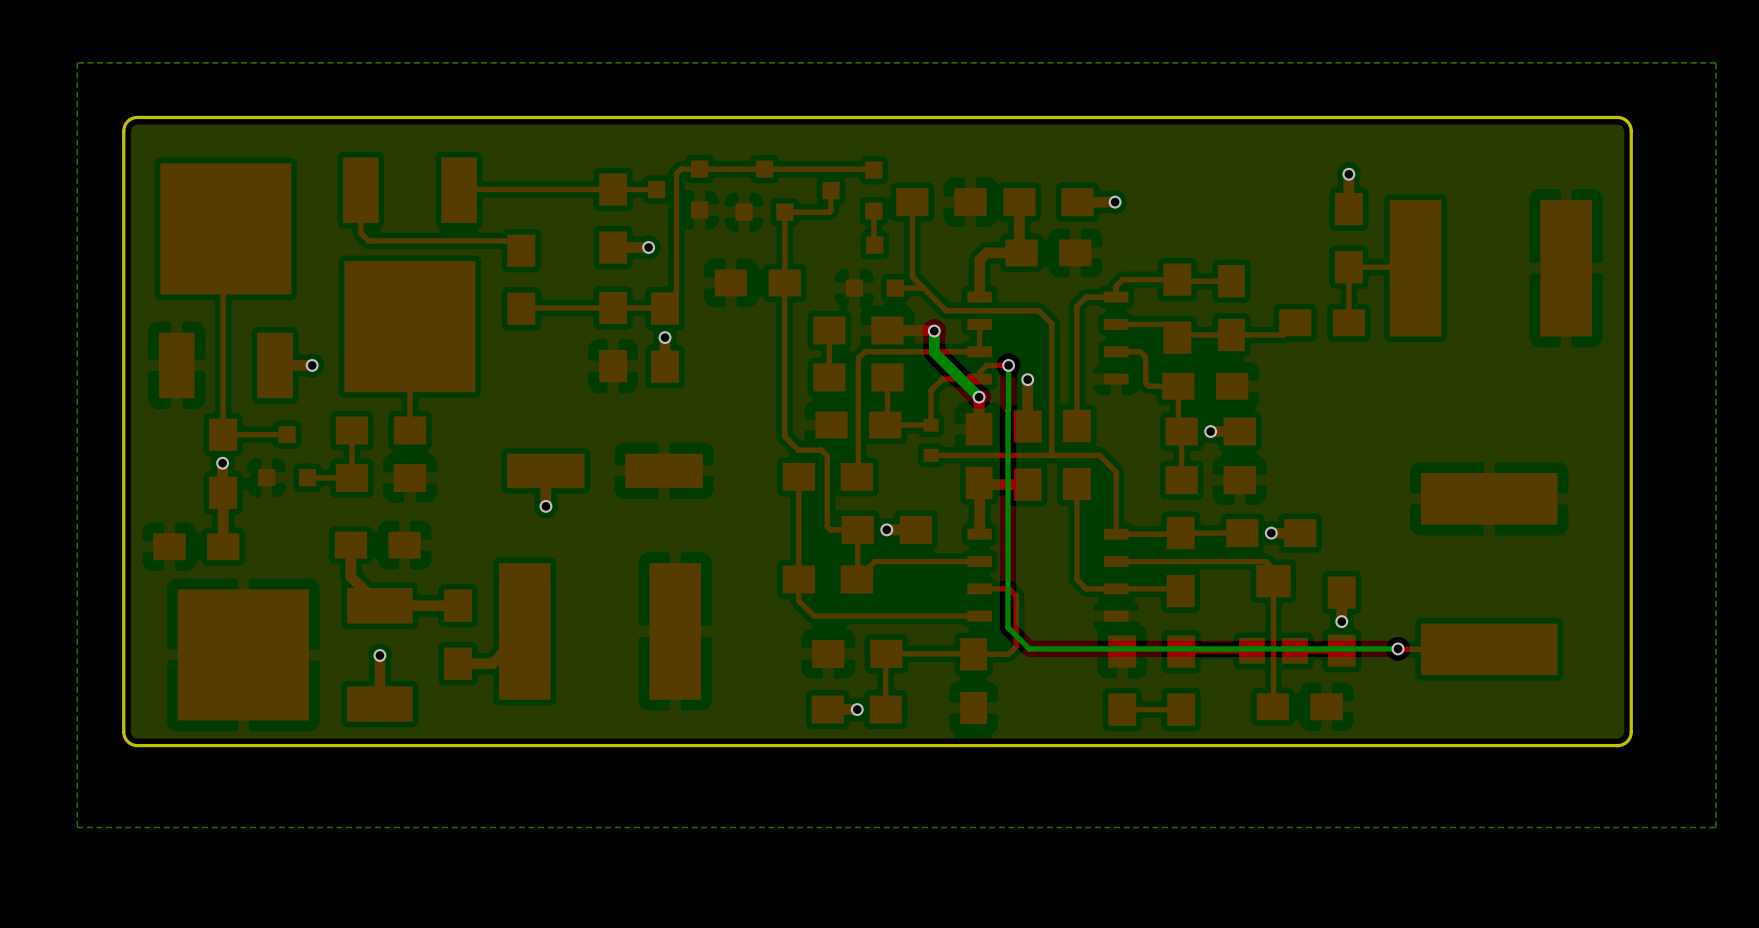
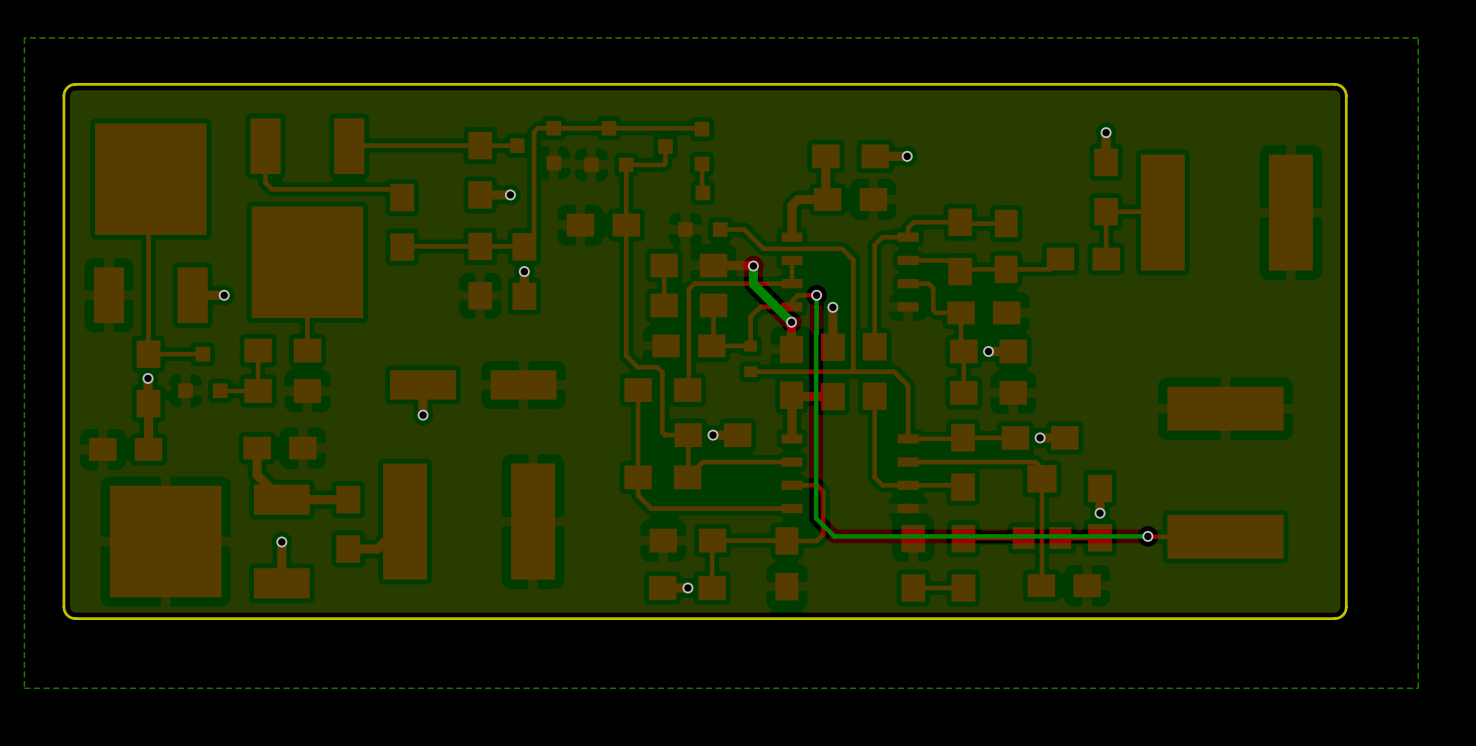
top track: (912, 202) (912, 276) (923, 288) -> none
part: (941, 202) -> none

